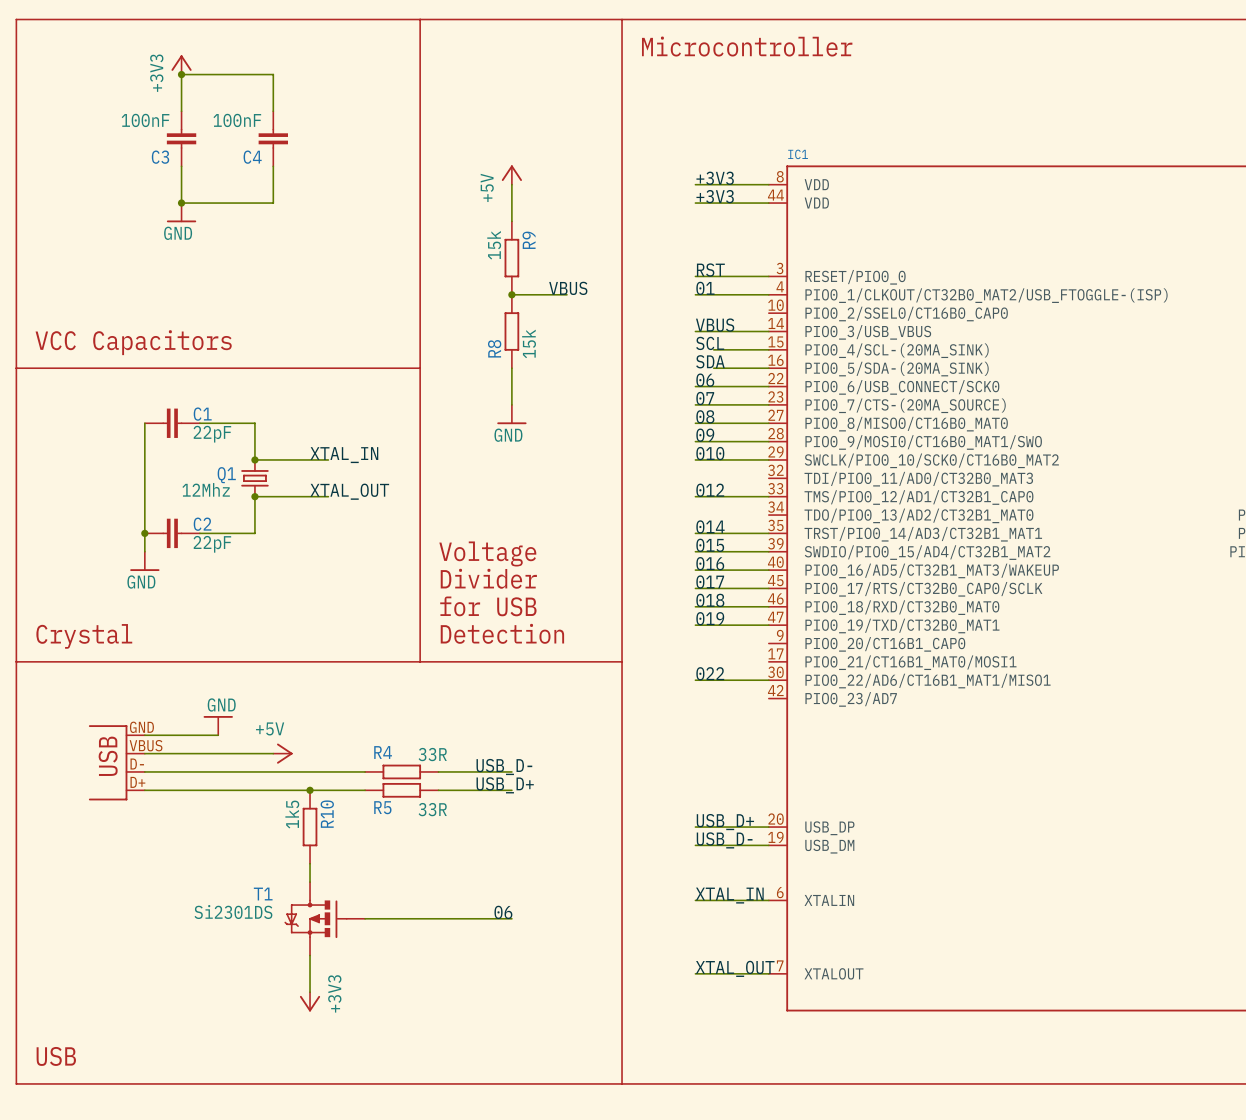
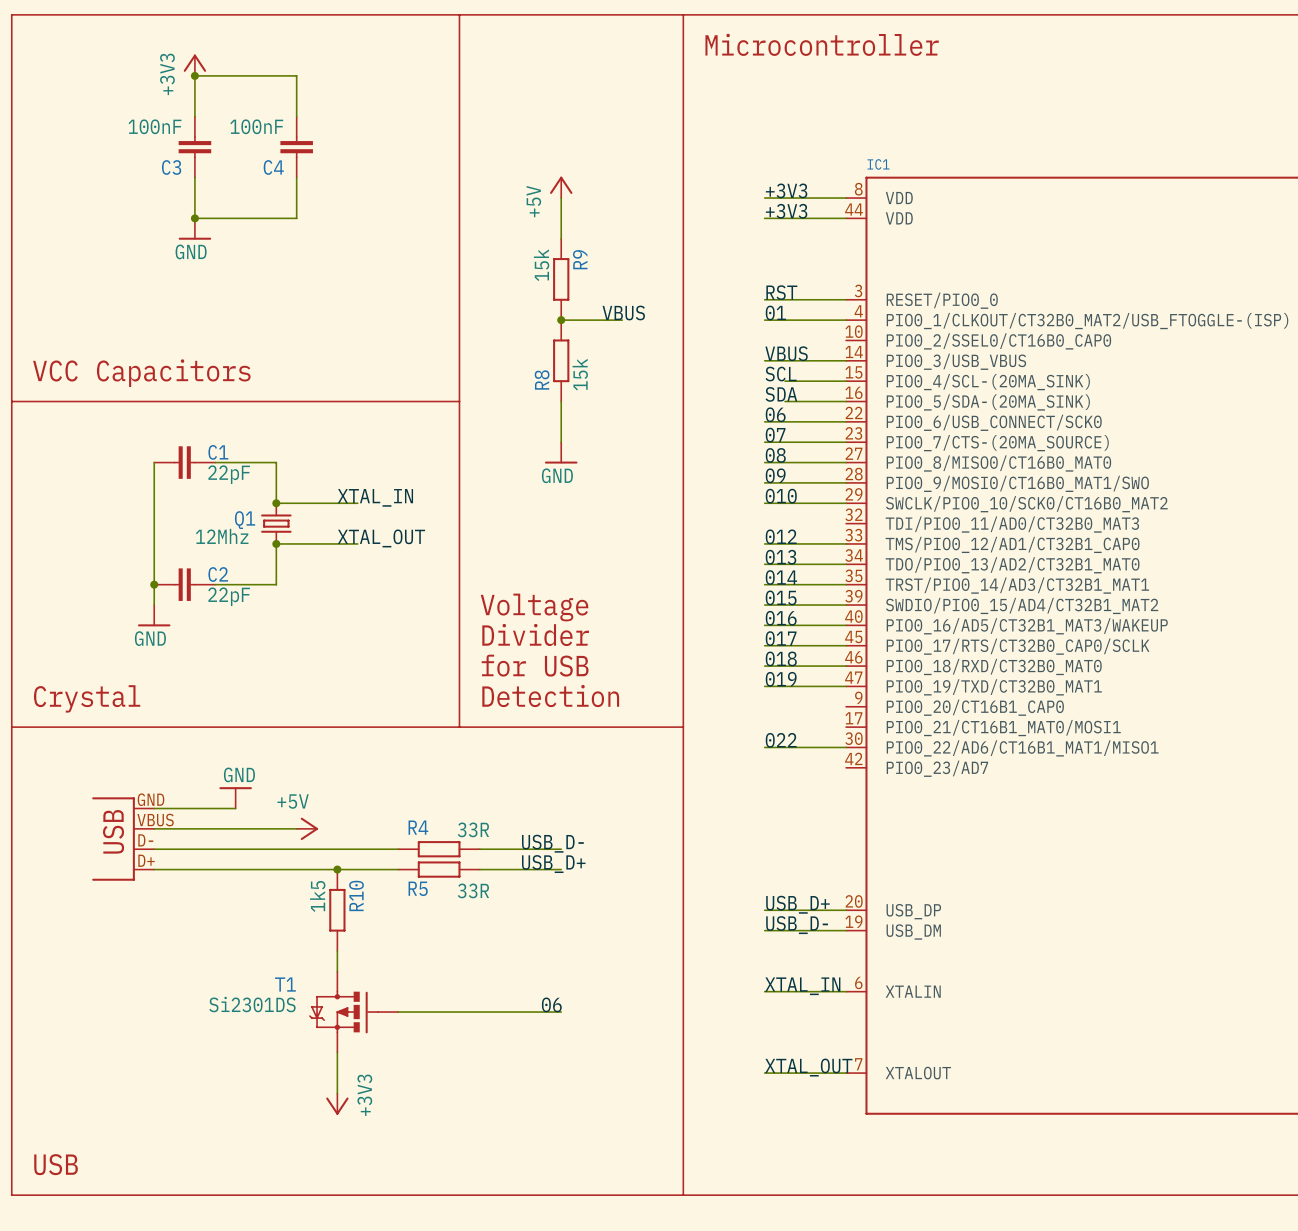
label: none -> 013 (781, 557)
wire: none -> (764, 564) (846, 564)

